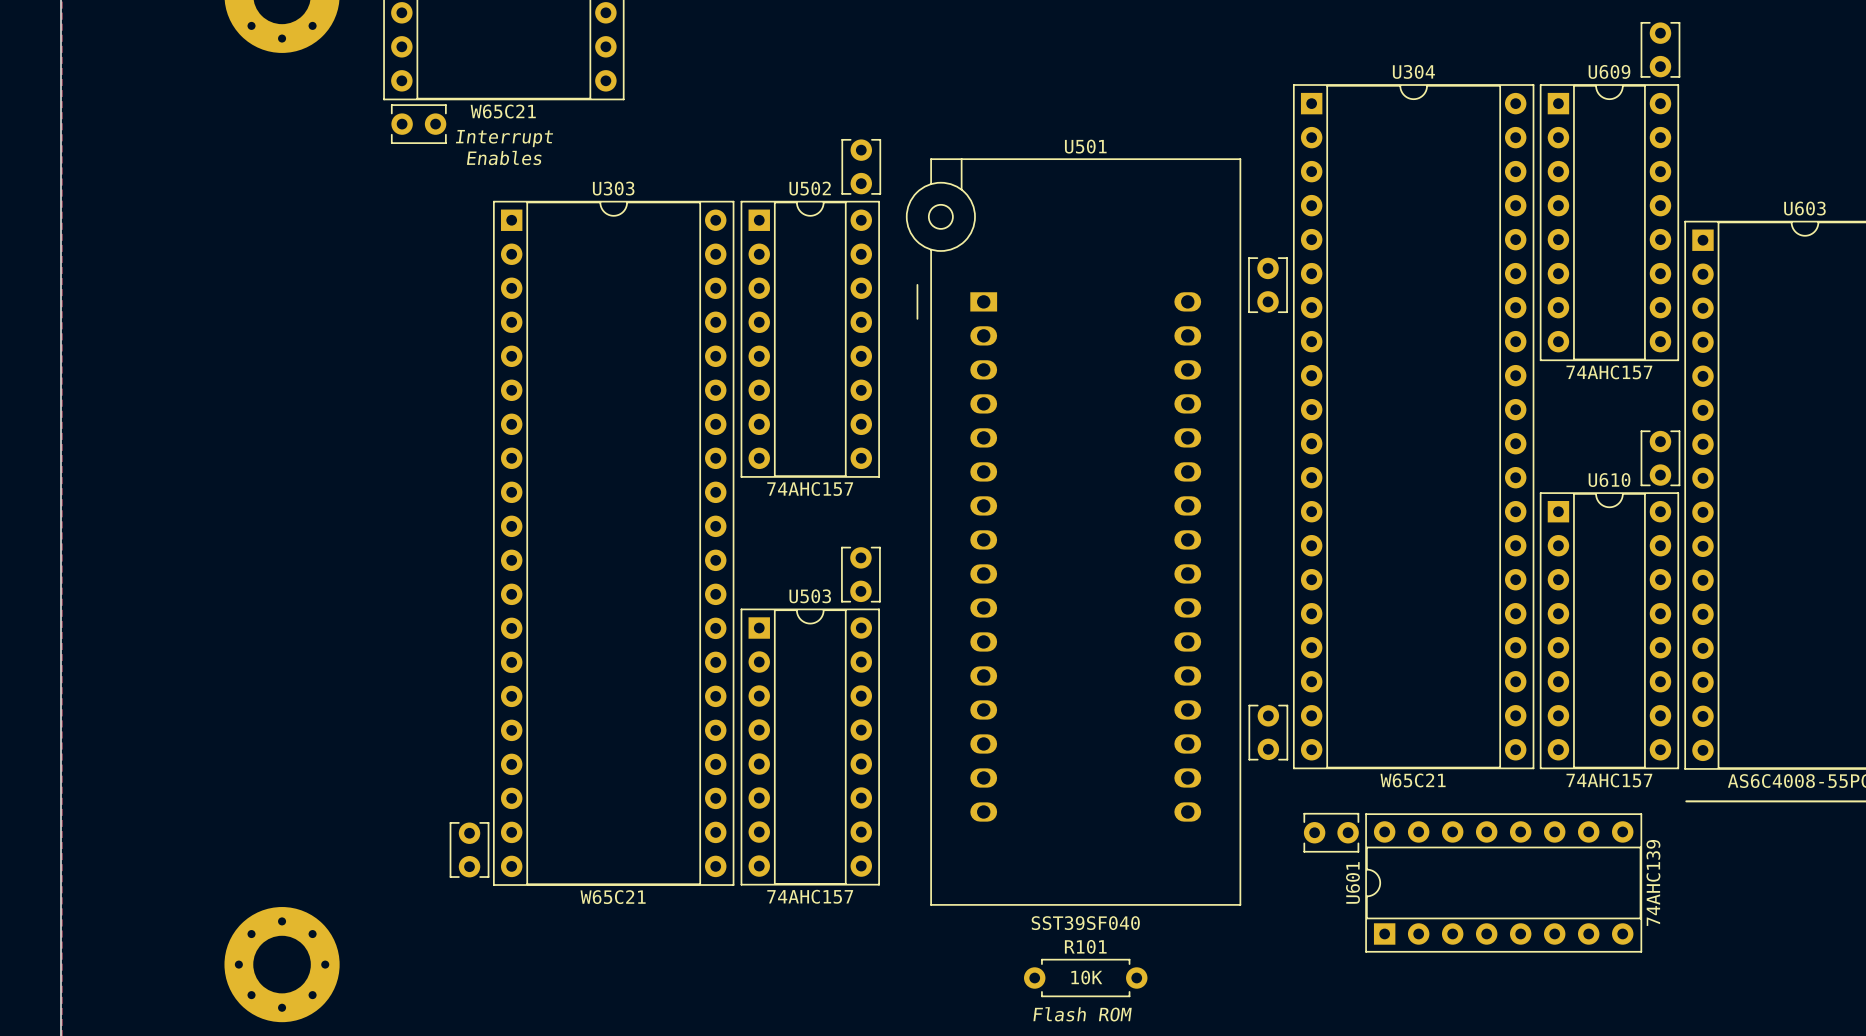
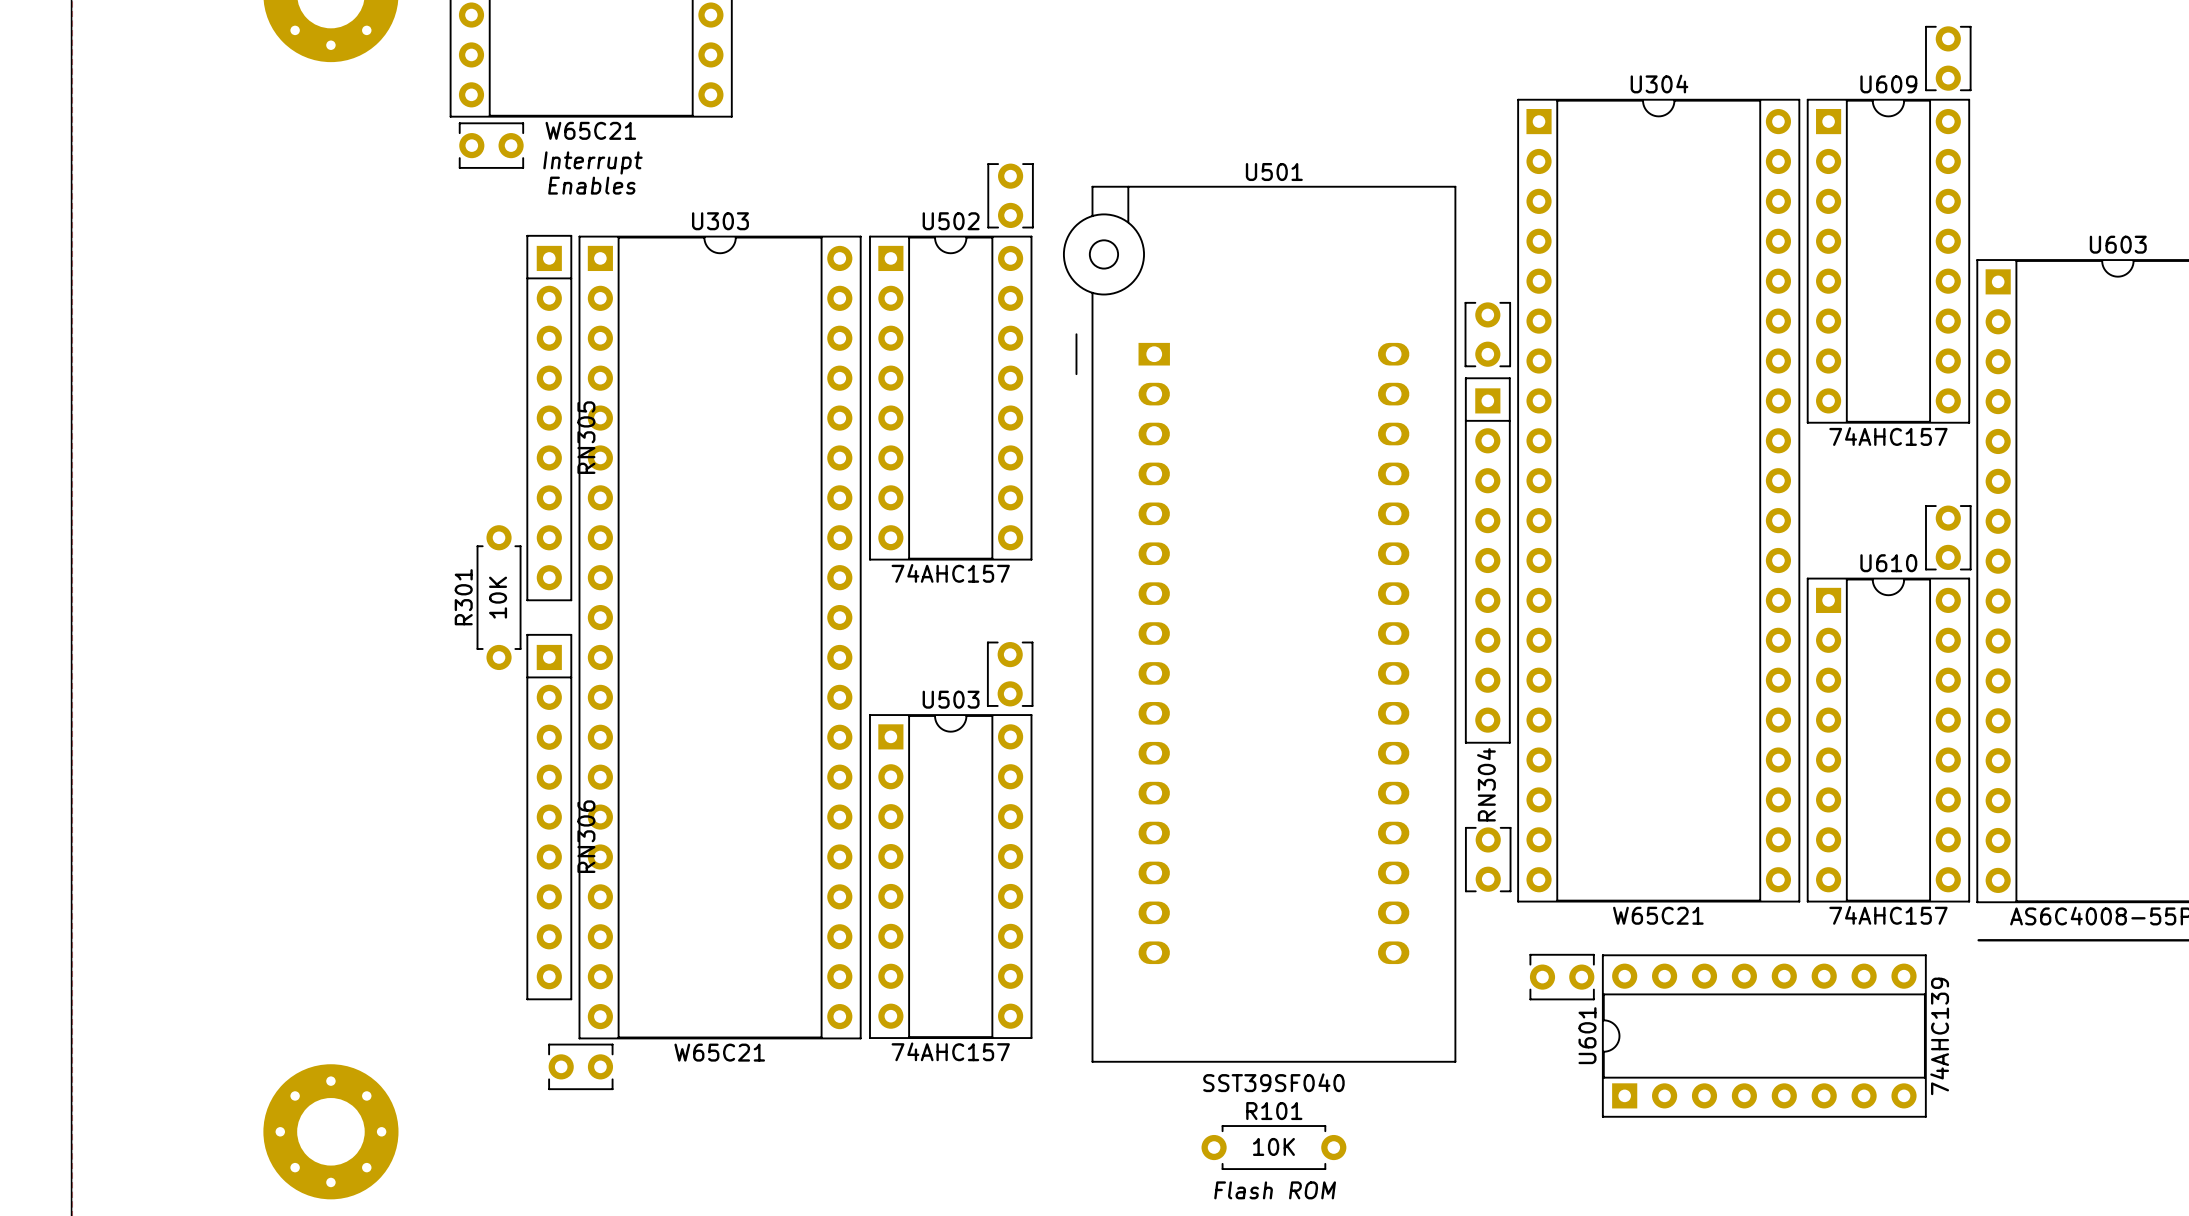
RN305: none -> (549, 418)
RN304: none -> (1487, 560)
R301: none -> 10K (499, 597)
RN306: none -> (549, 817)
part rotation: 0° (469, 849) -> 90° clockwise (580, 1066)
part position: (469, 849) -> (580, 1066)

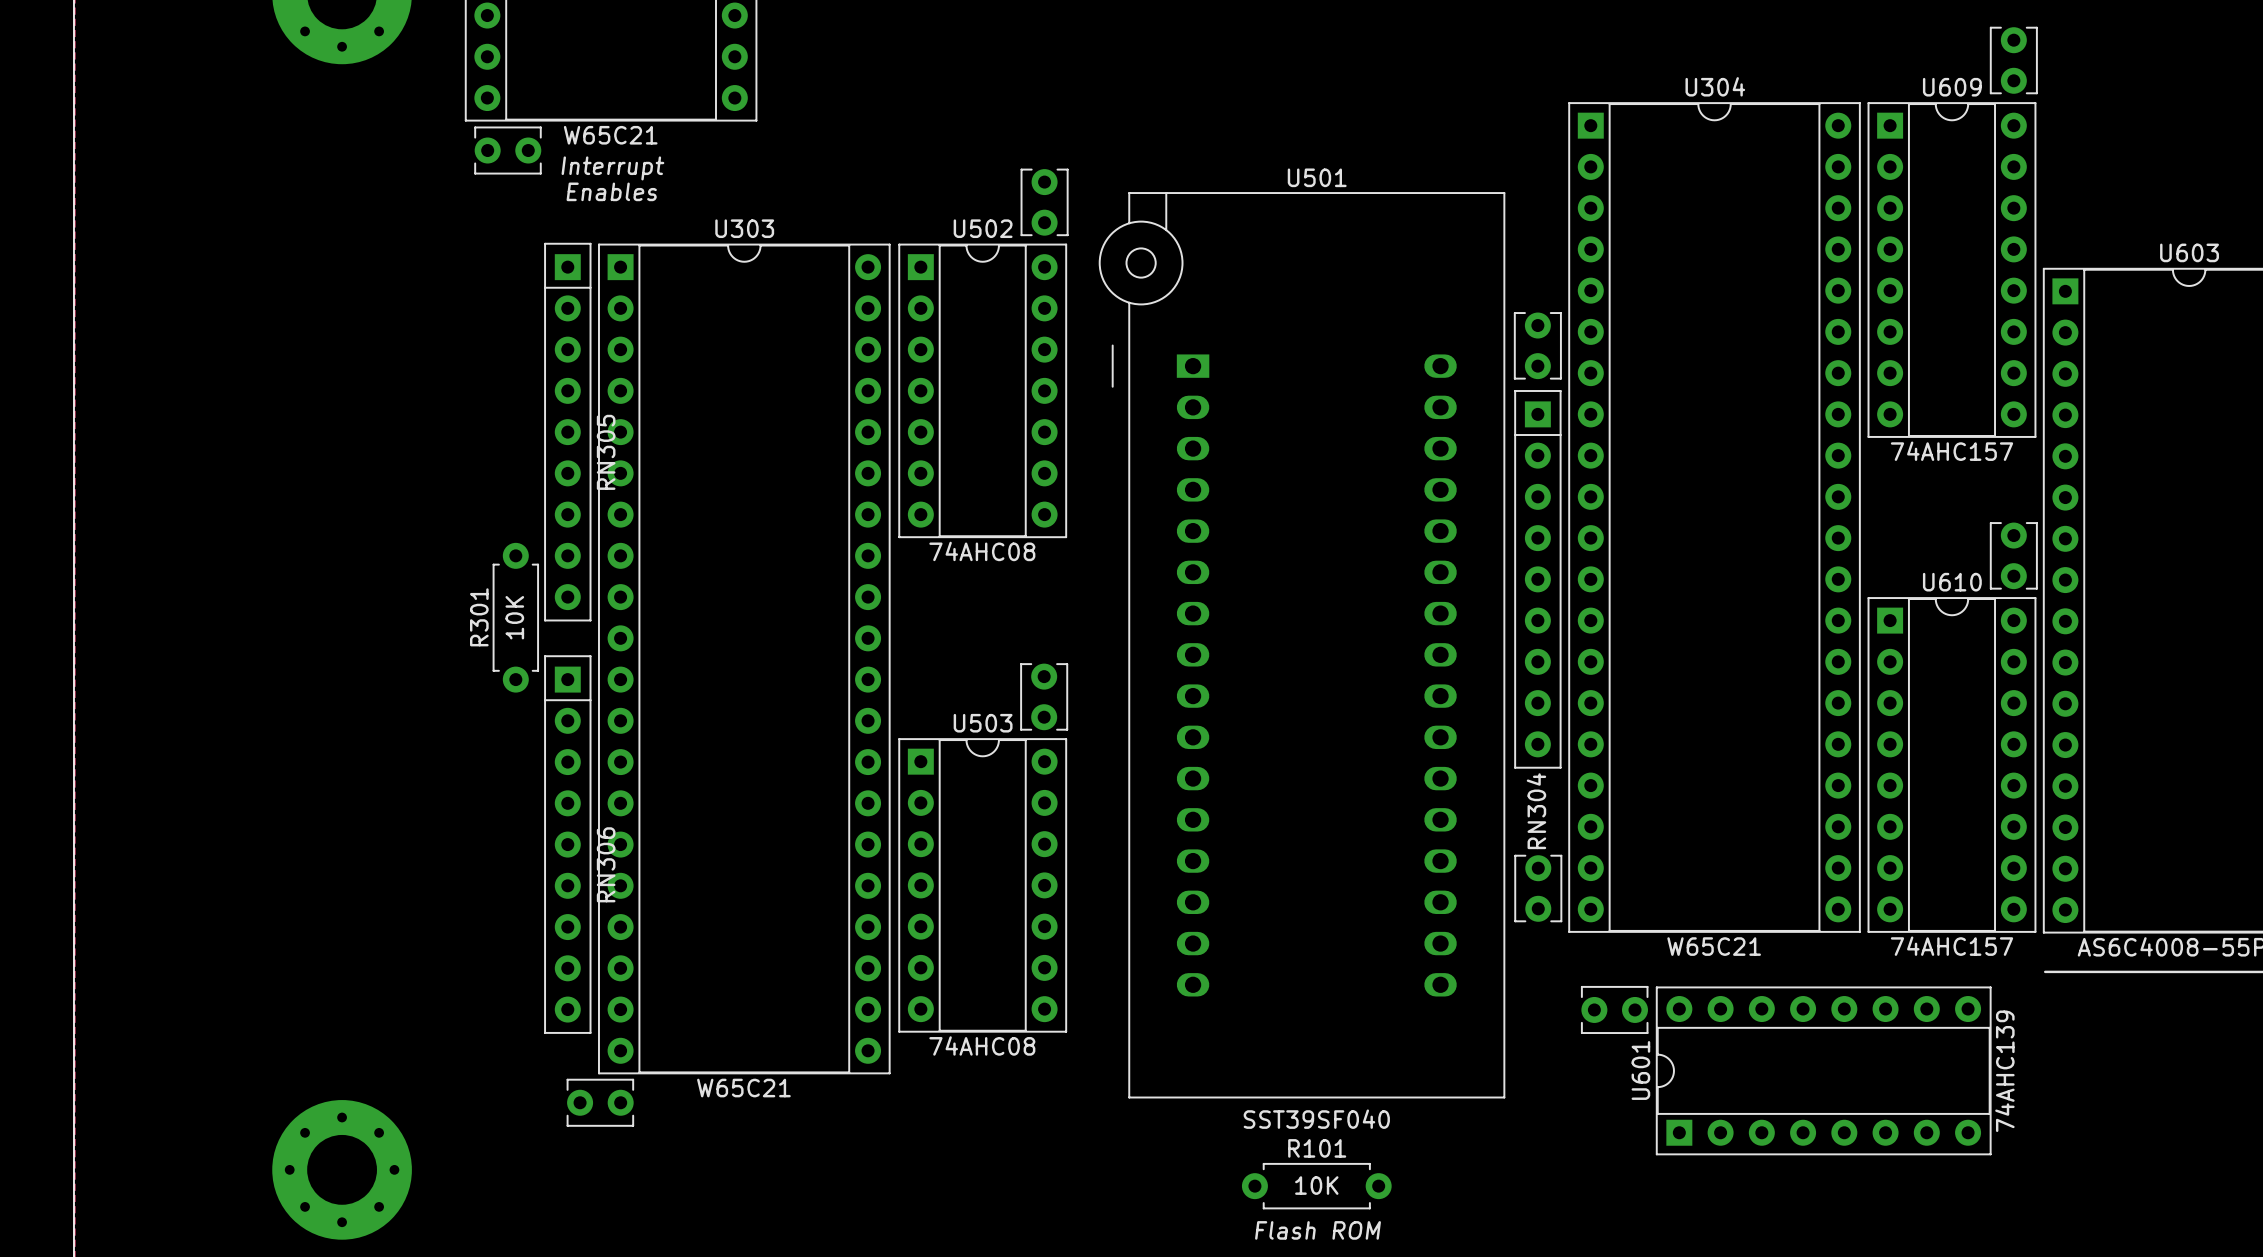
U502 footprint: [869, 235, 1033, 561] -> [898, 243, 1068, 539]
U502 value: 74AHC157 (950, 573) -> 74AHC08 (982, 551)
U503 footprint: [869, 714, 1033, 1039] -> [898, 738, 1068, 1033]
U503 value: 74AHC157 (950, 1051) -> 74AHC08 (982, 1045)

